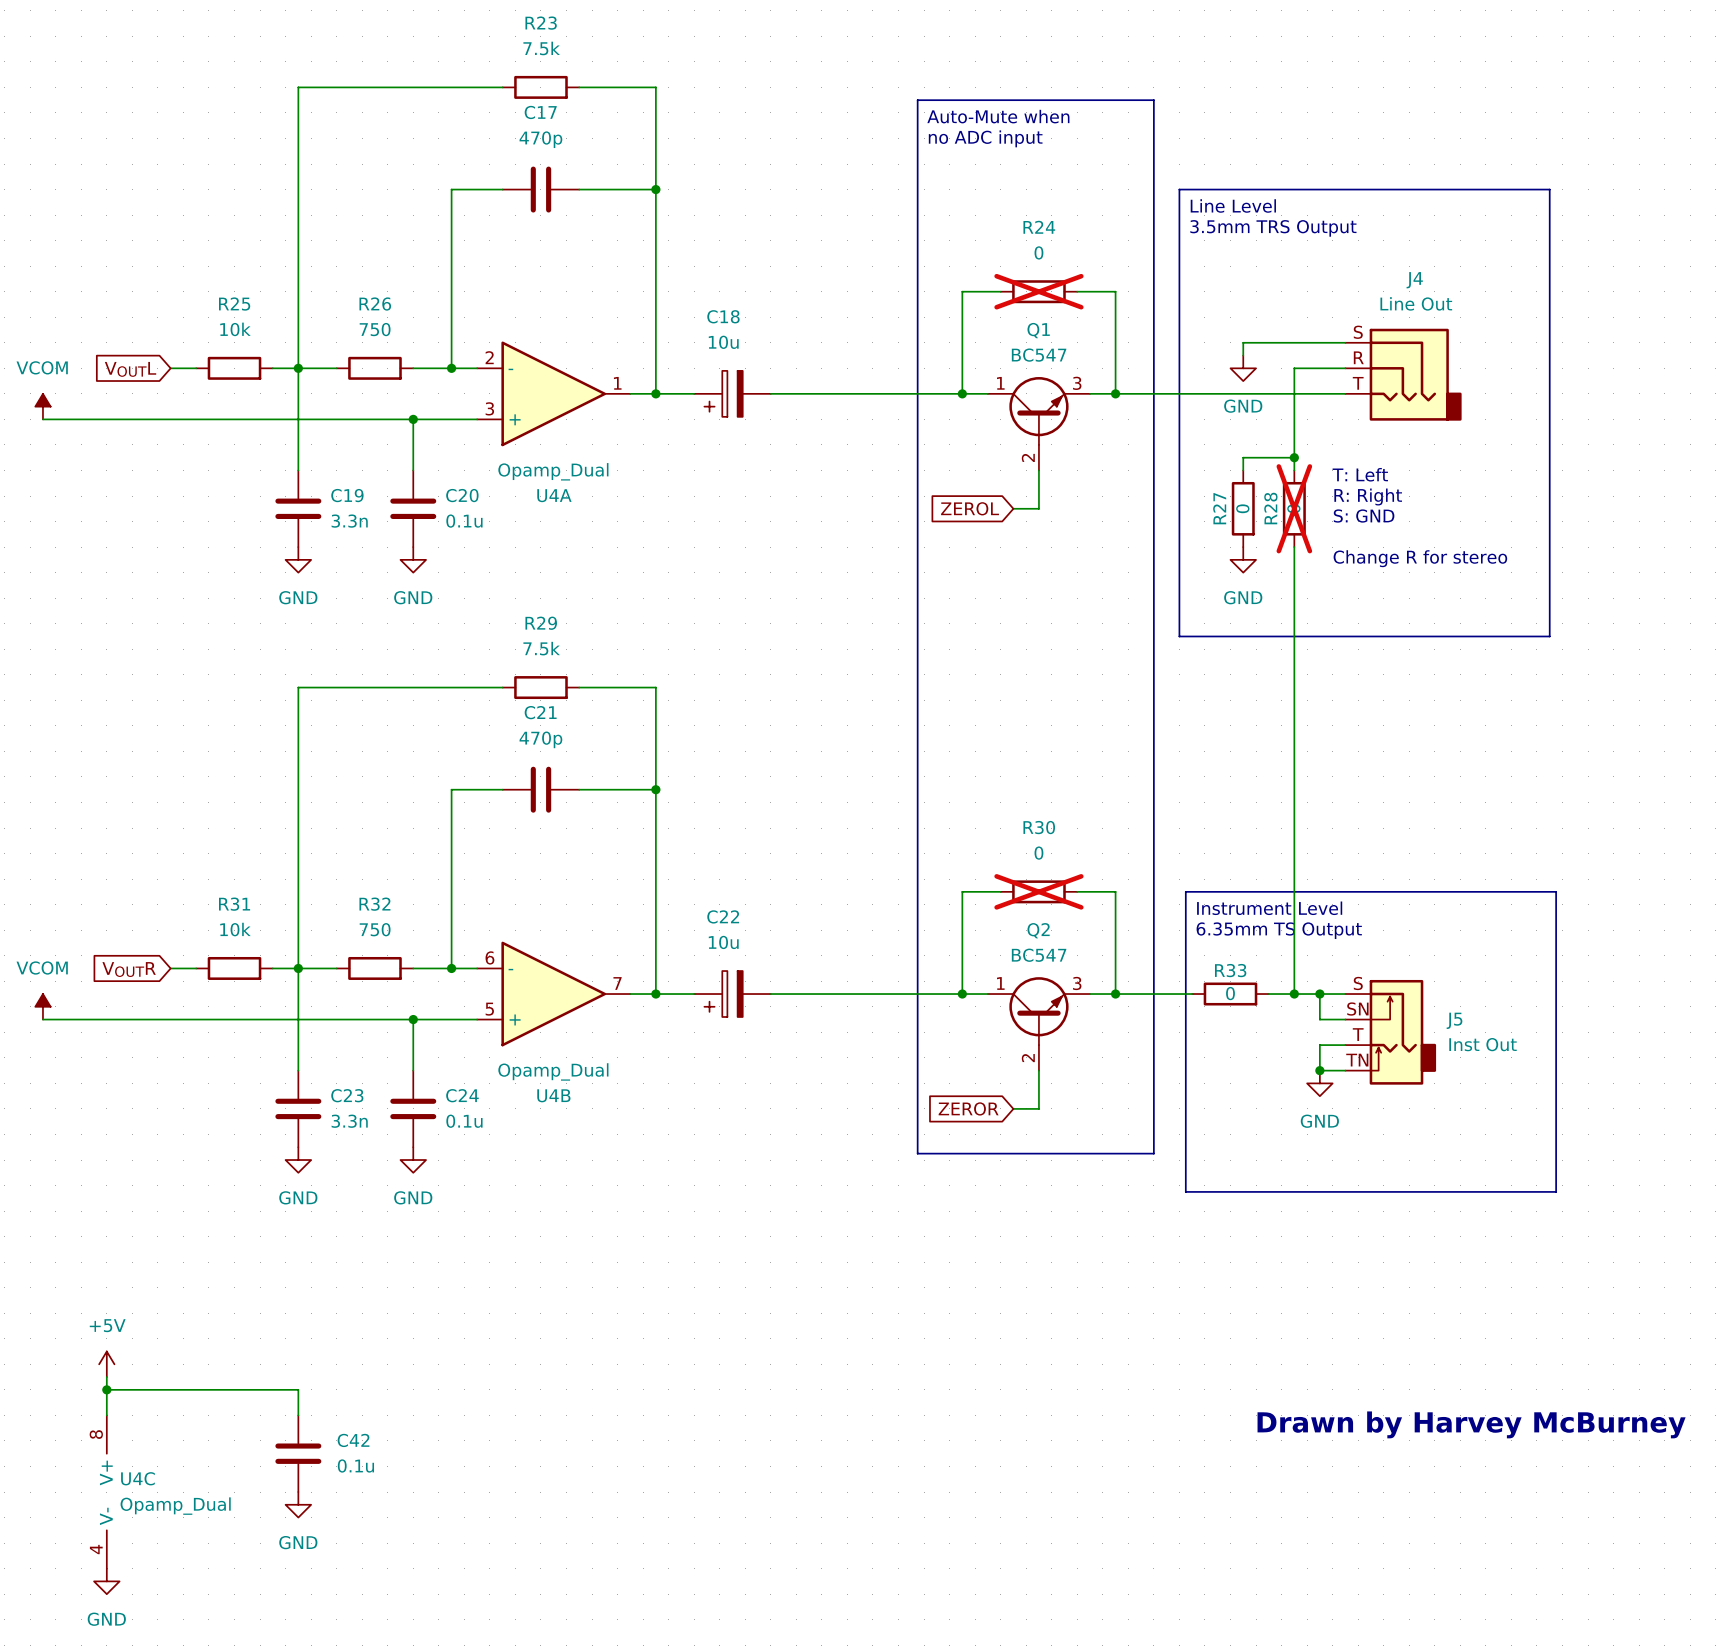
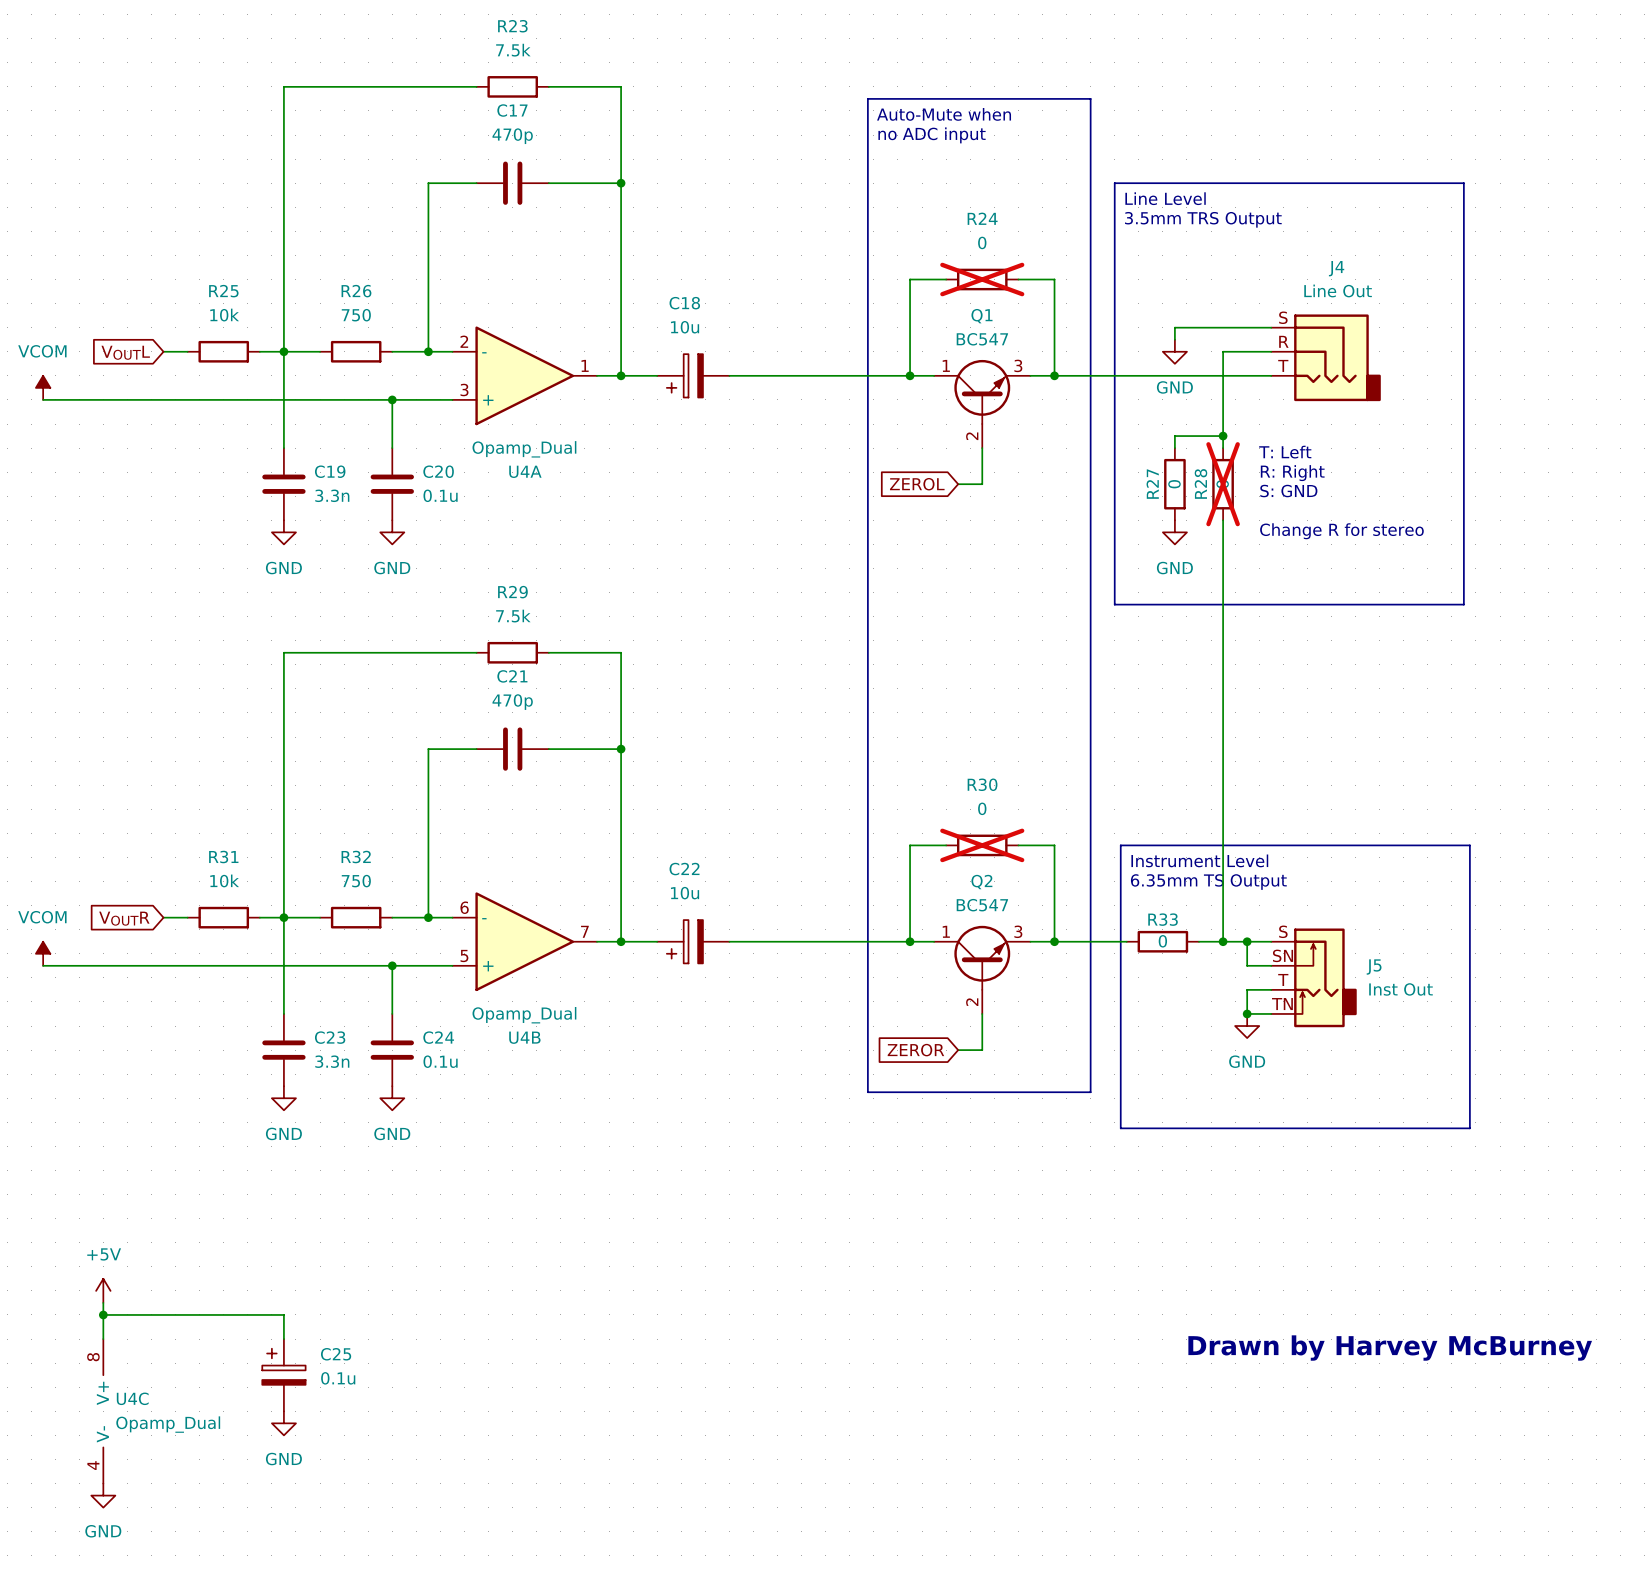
C42: 0.1u (298, 1453) -> none
C25: none -> 0.1u (283, 1375)

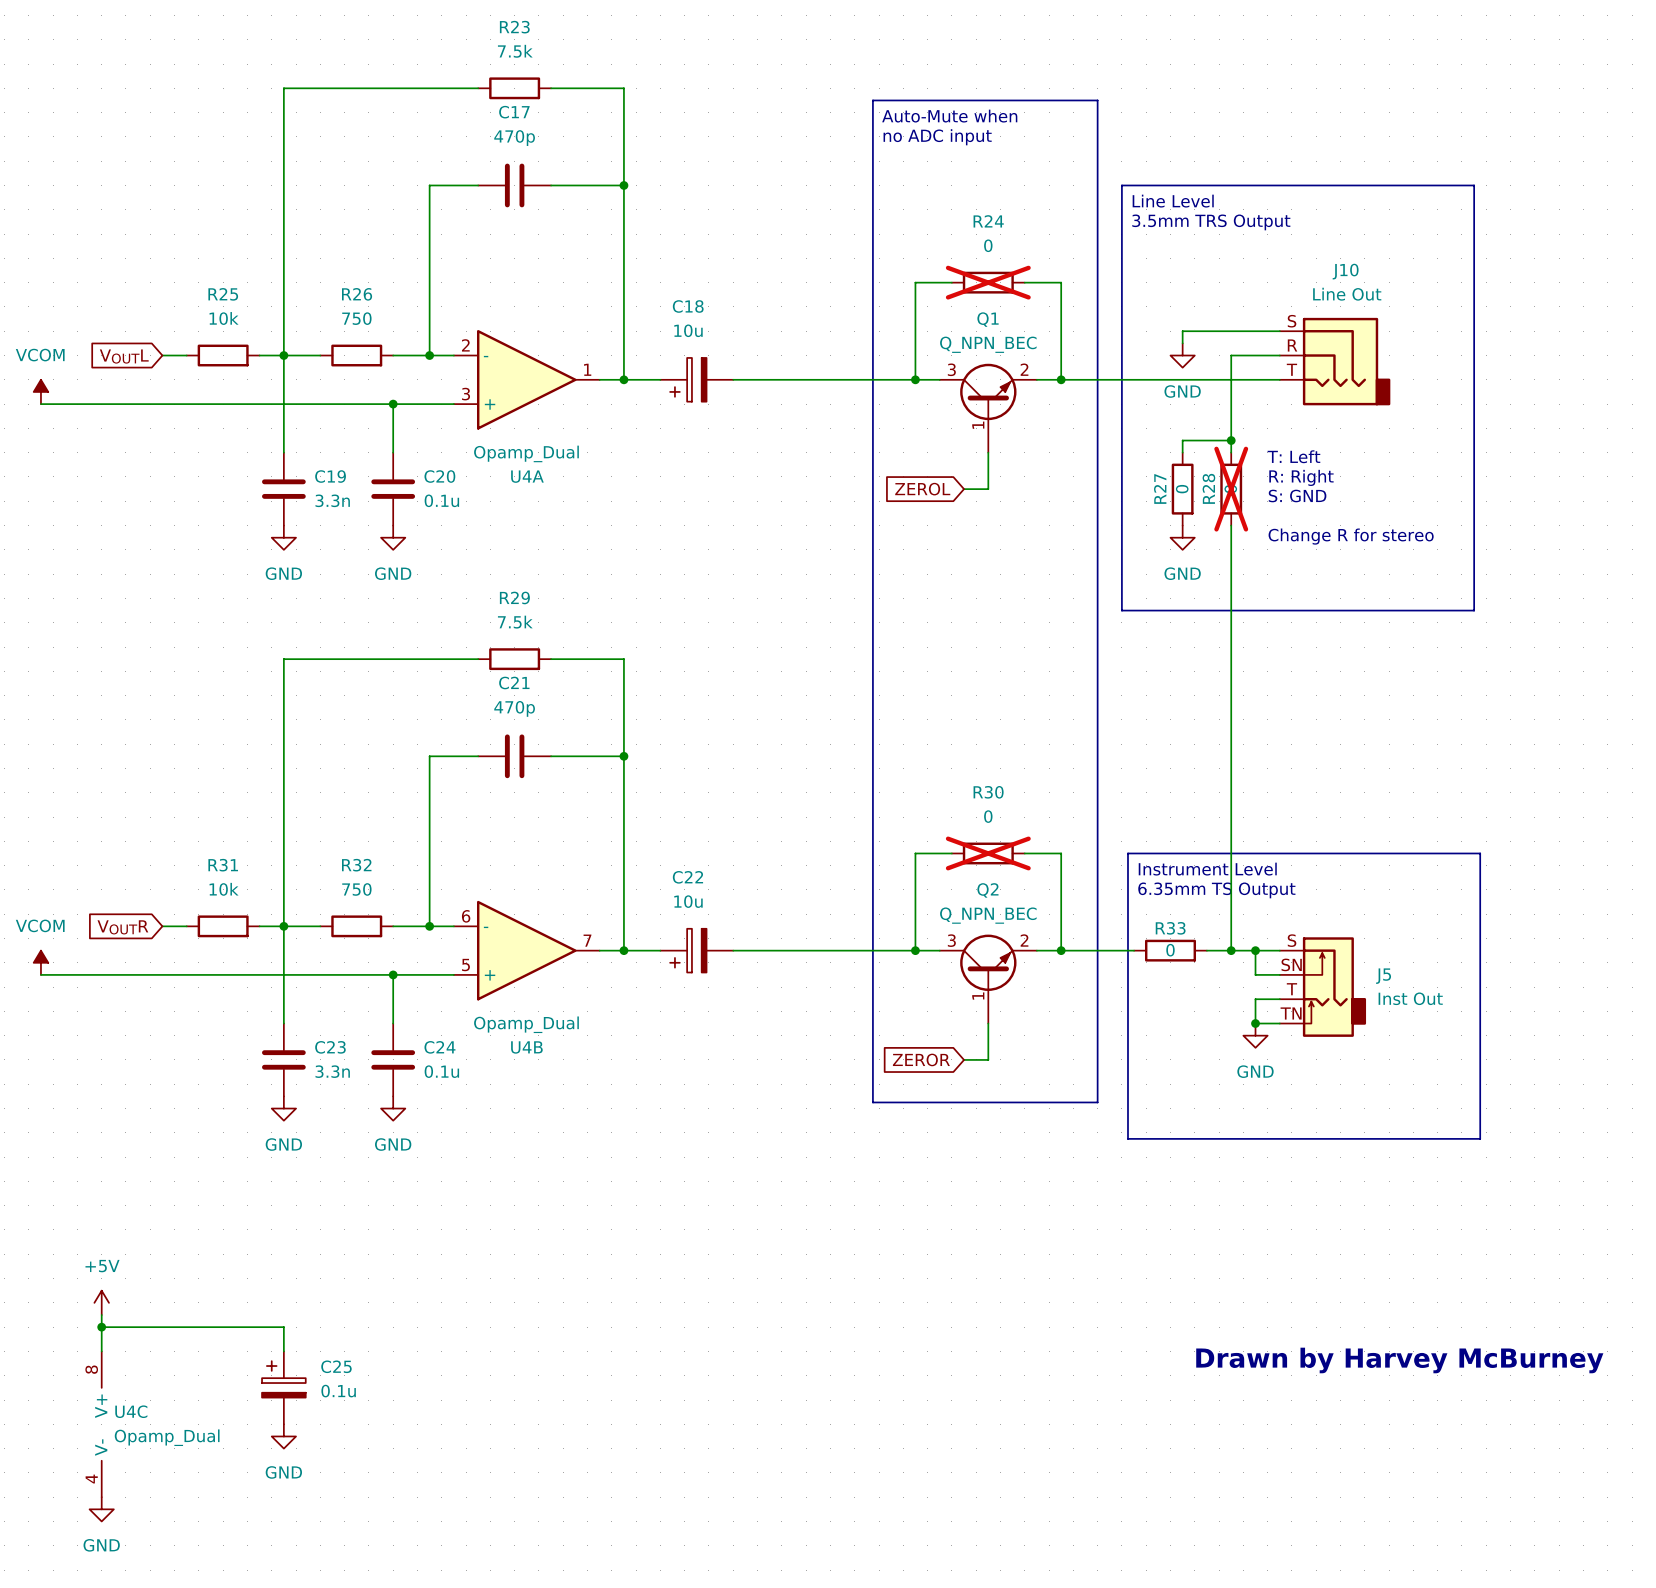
J4 name: J4 (1336, 268) -> J10 (1345, 271)
Q1 value: BC547 (982, 339) -> Q_NPN_BEC (988, 344)
Q1 symbol: [934, 359, 1031, 449] -> [939, 363, 1037, 453]
Q2 value: BC547 (982, 905) -> Q_NPN_BEC (988, 915)
Q2 symbol: [934, 925, 1031, 1014] -> [939, 934, 1037, 1024]

